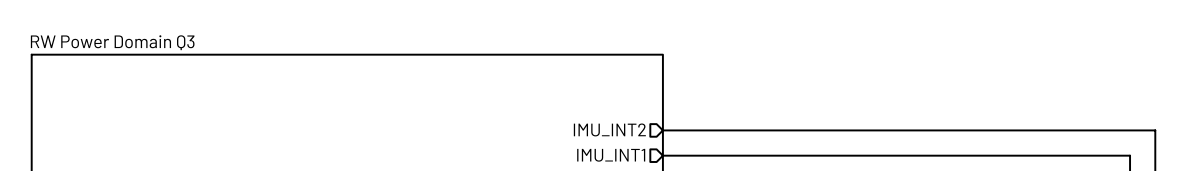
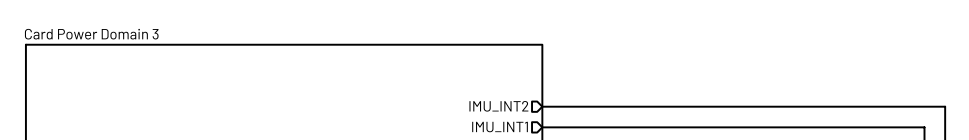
sheet RW Power Domain Q3 name: RW Power Domain Q3 (112, 42) -> Card Power Domain 3 (91, 34)

